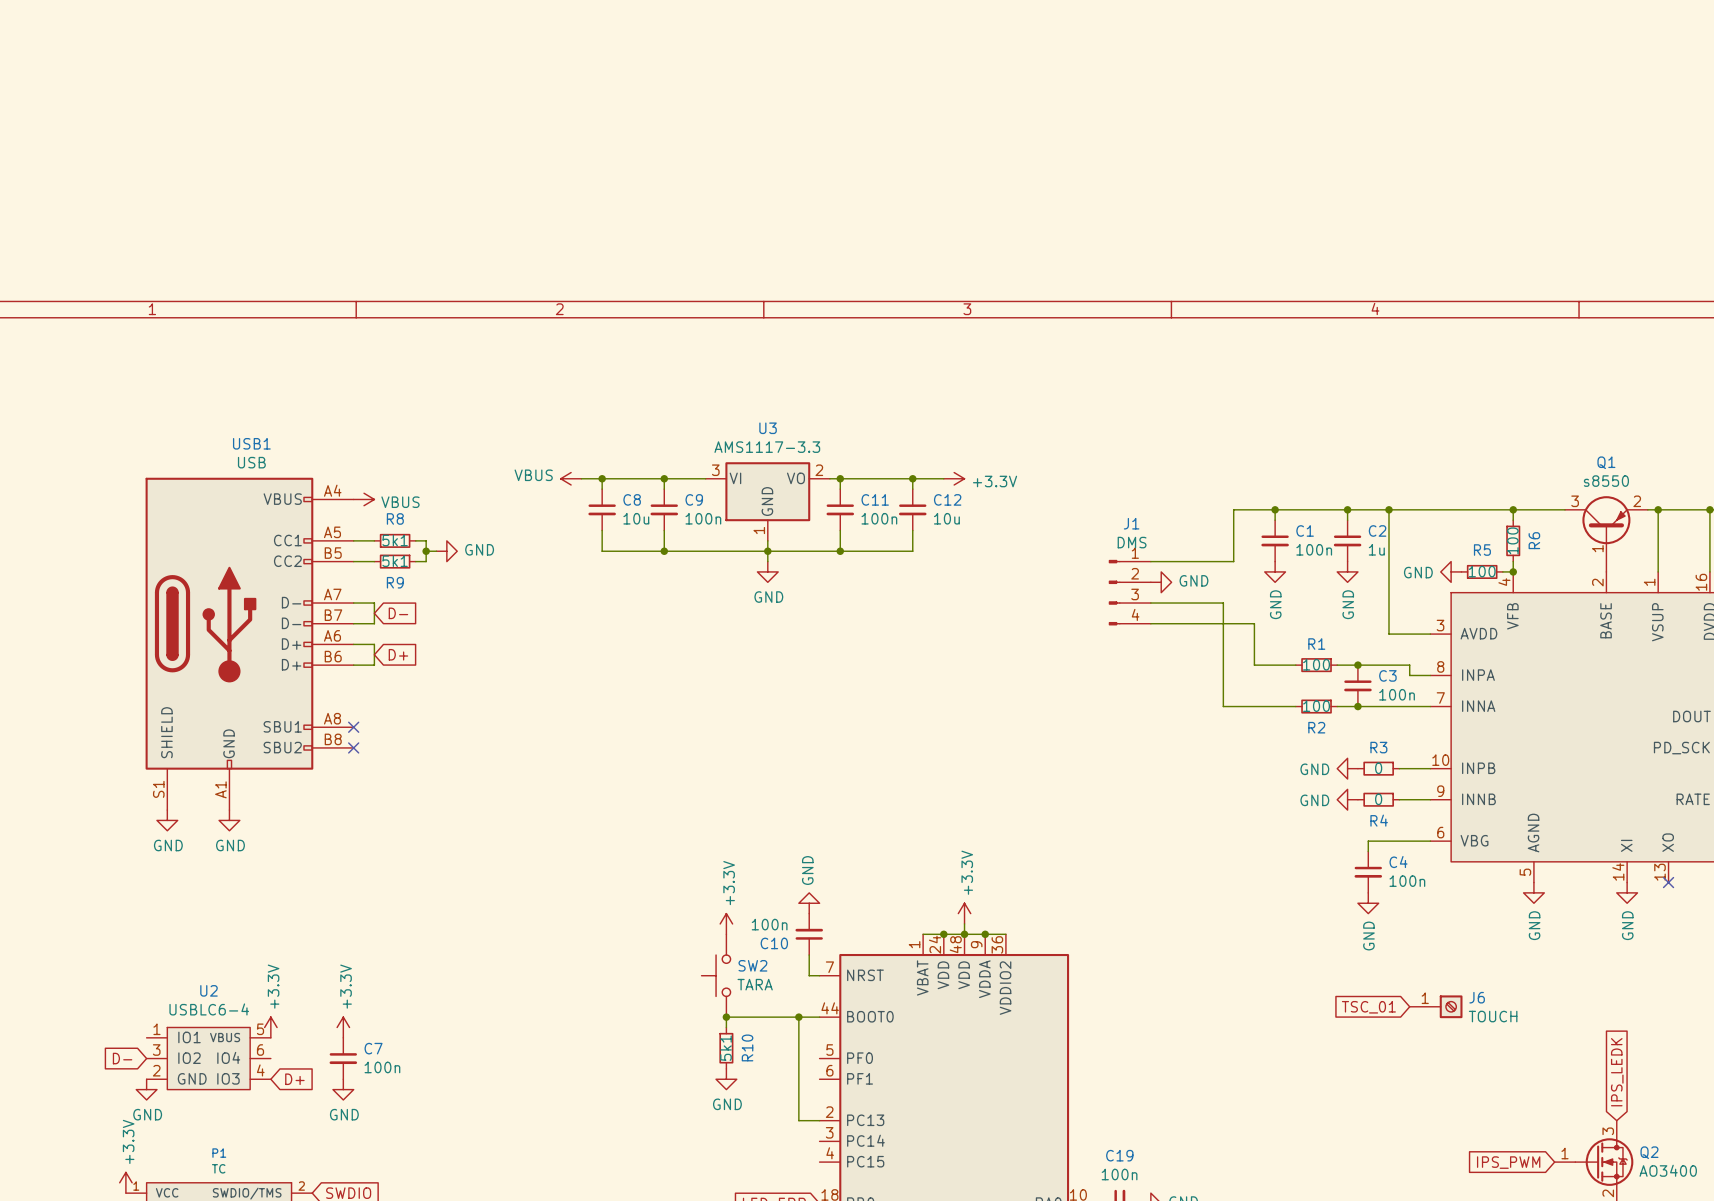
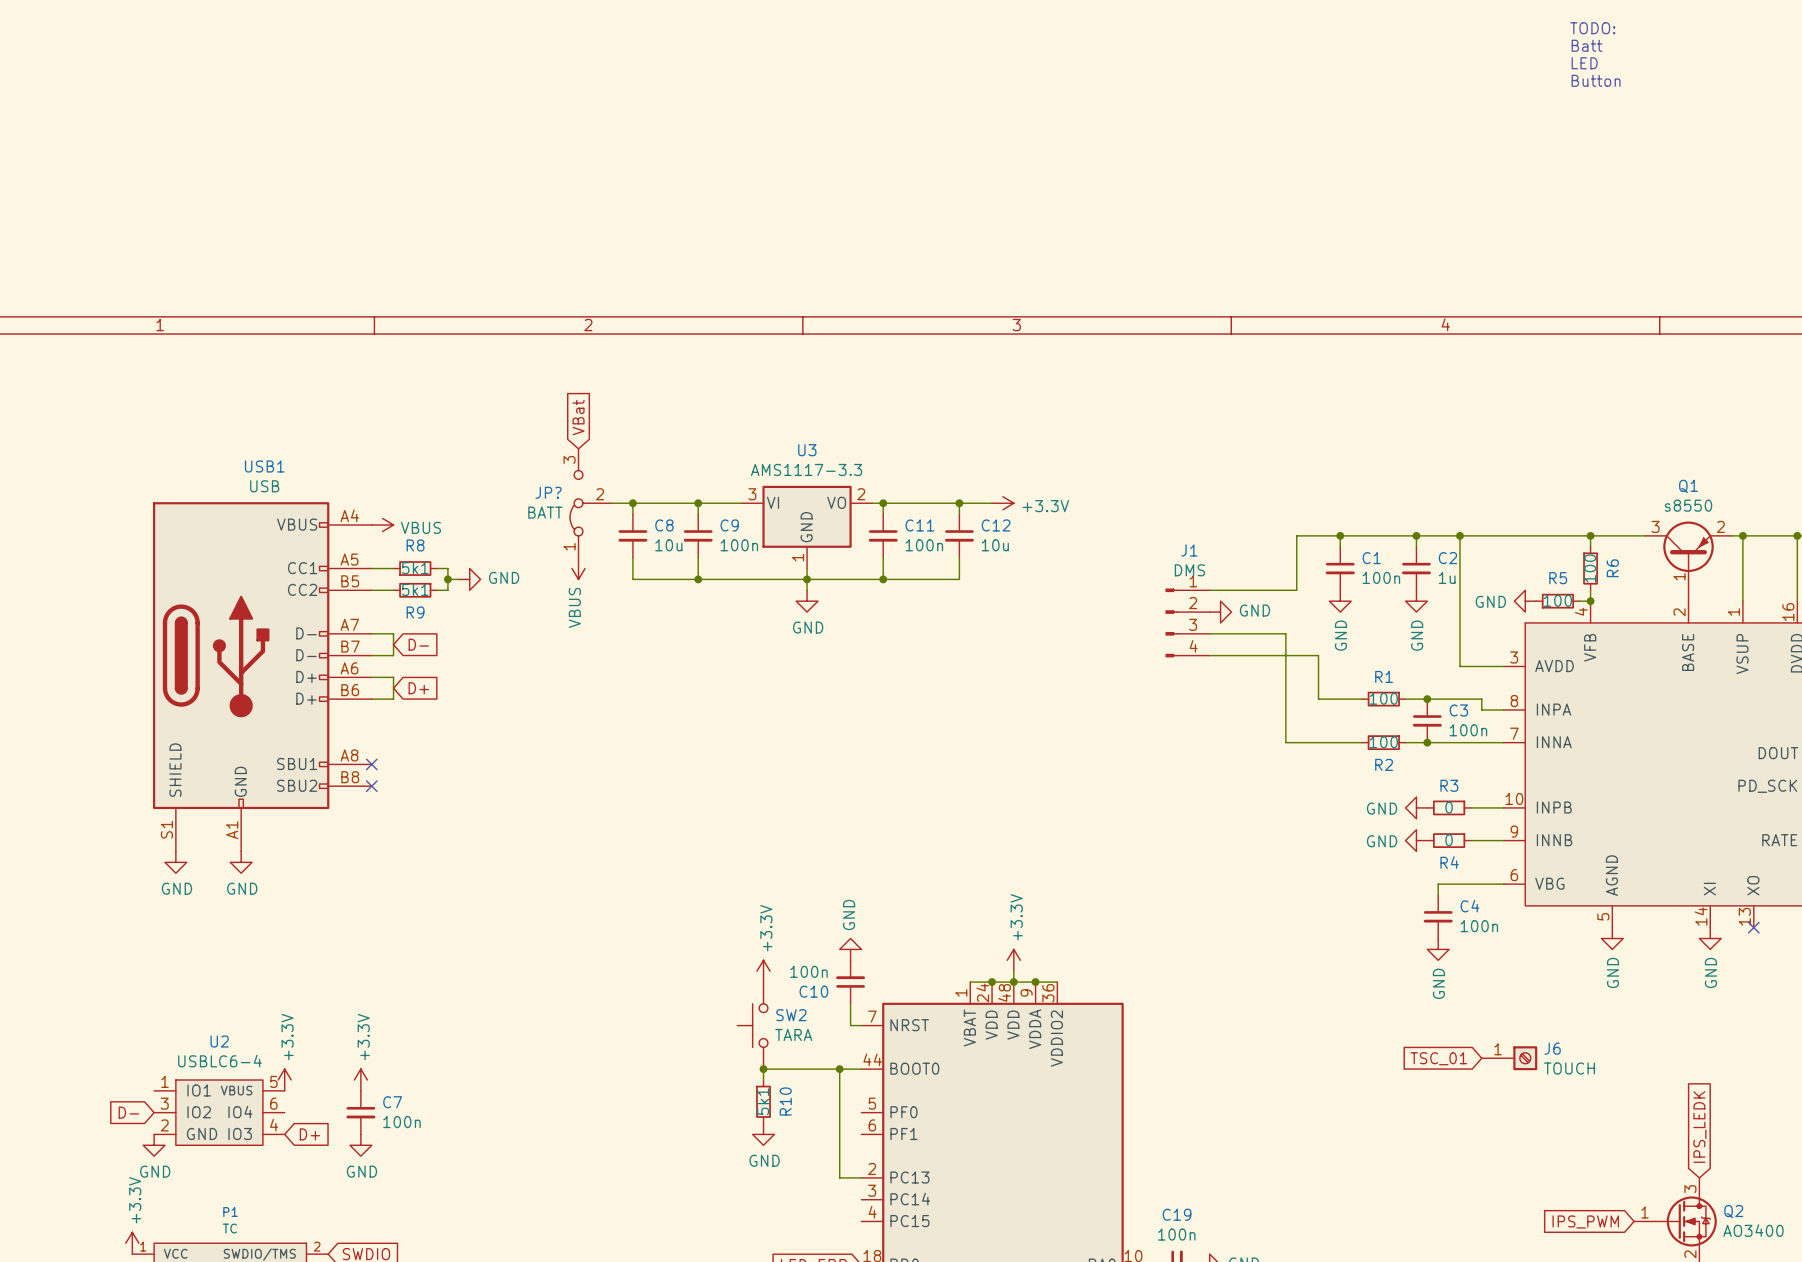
text: none -> TODO: (1592, 28)
text: none -> Batt (1587, 45)
text: none -> LED (1584, 63)
text: none -> Button (1596, 80)
global label: none -> VBat (578, 417)
JP?: none -> BATT (590, 503)
power symbol rotation: 0° (571, 478) -> 90° counterclockwise (578, 568)
power symbol position: VBUS (571, 478) -> VBUS (578, 568)

